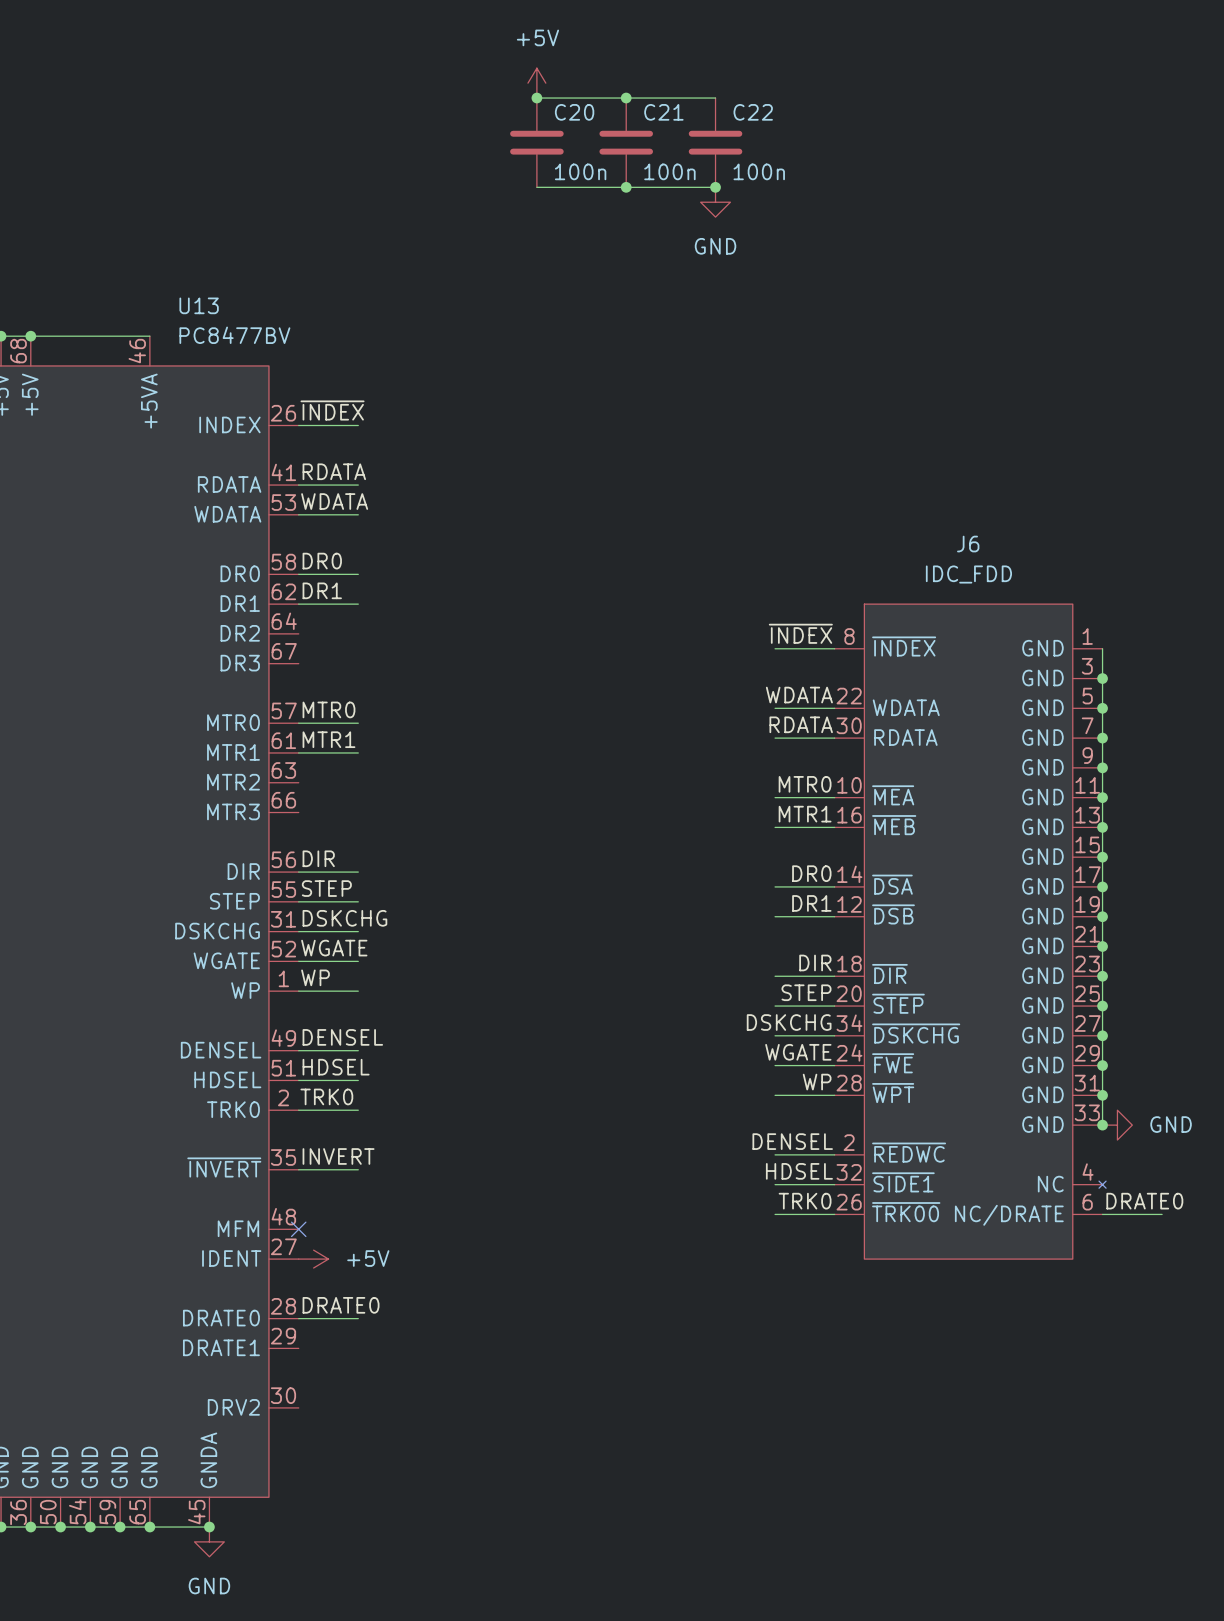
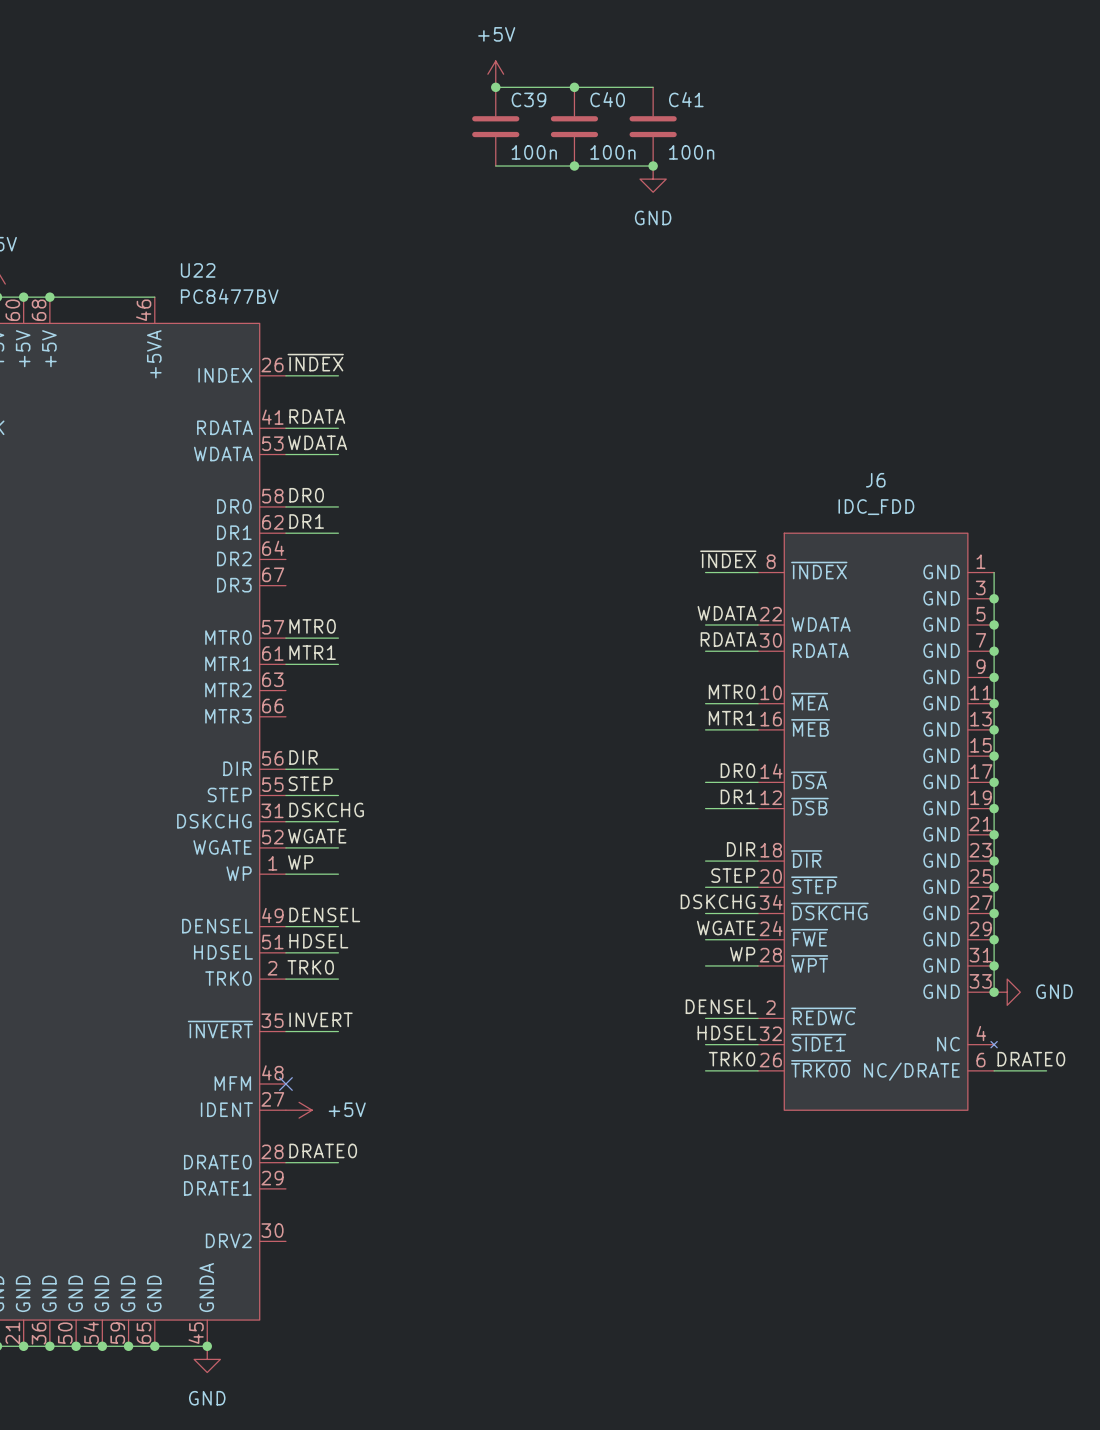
C20 name: C20 (574, 112) -> C39 (528, 99)
C21 name: C21 (663, 112) -> C40 (607, 99)
C22 name: C22 (753, 112) -> C41 (686, 99)
U13 name: U13 (199, 305) -> U22 (198, 270)

